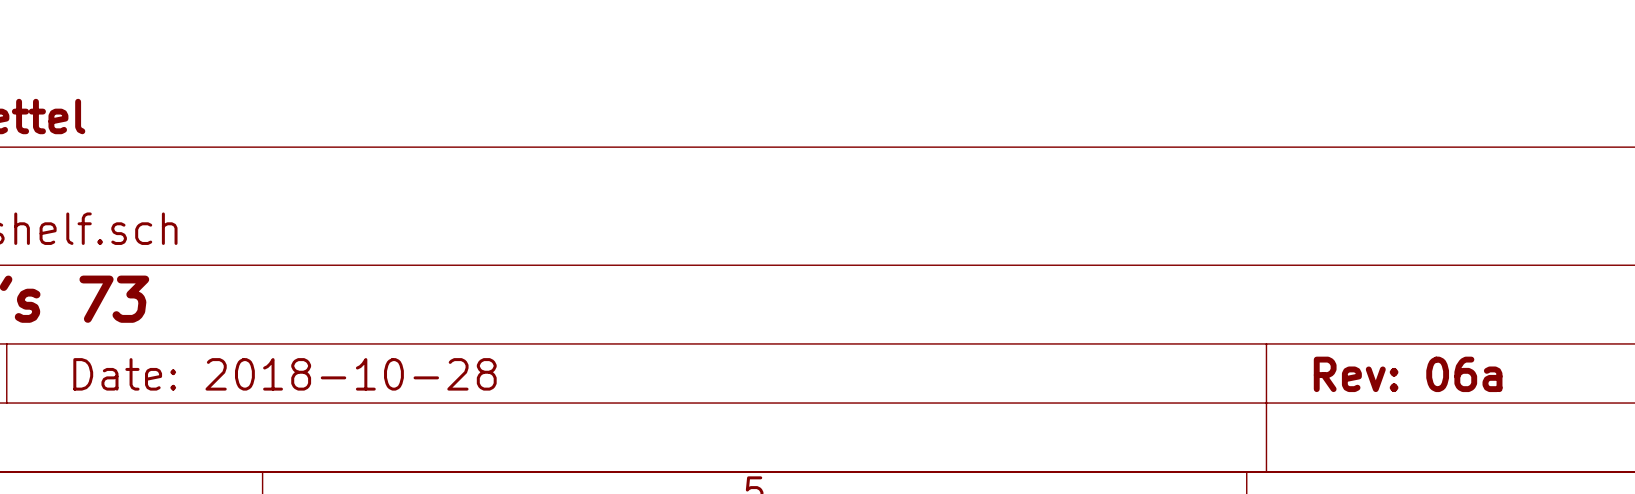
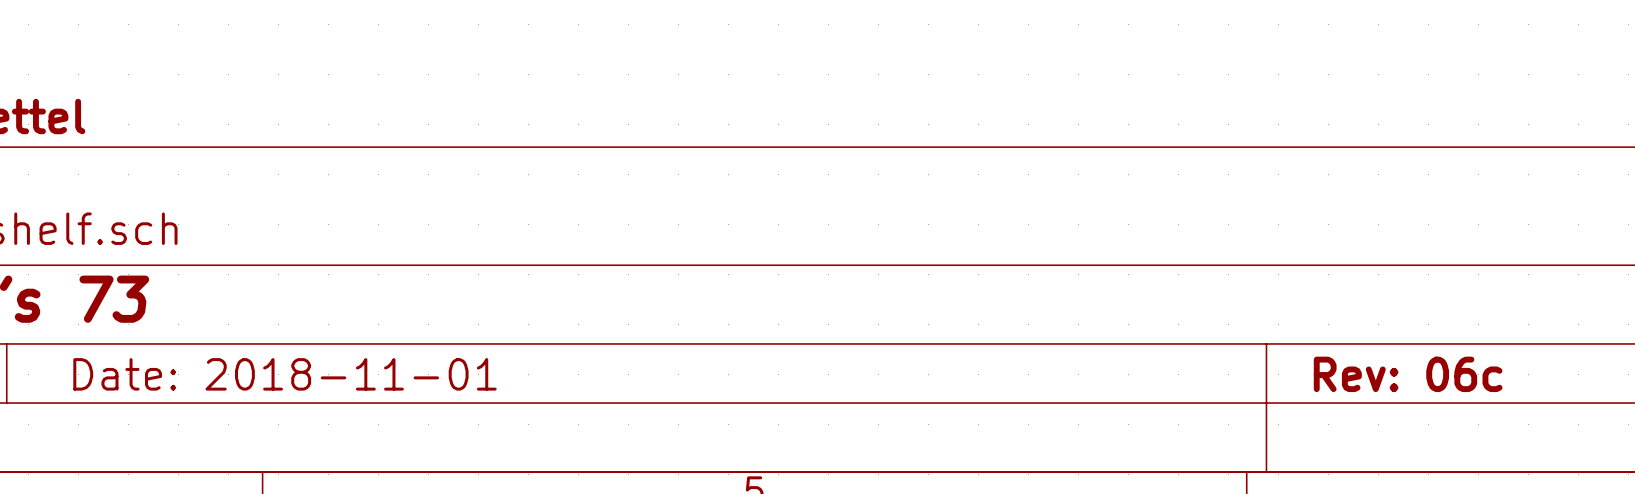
title block: Date: 2018-10-28 (284, 374) -> Date: 2018-11-01 (284, 374)
title block: Rev: 06a (1408, 374) -> Rev: 06c (1408, 374)

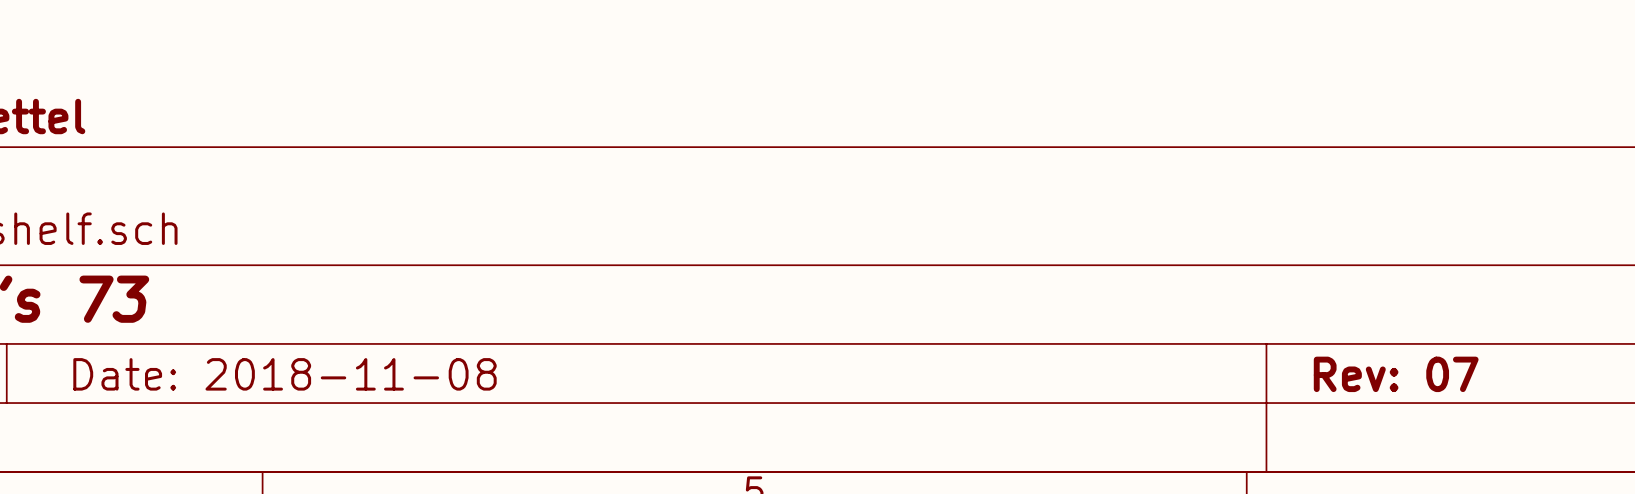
title block: Date: 2018-11-01 (284, 374) -> Date: 2018-11-08 (284, 374)
title block: Rev: 06c (1408, 374) -> Rev: 07 (1396, 374)

